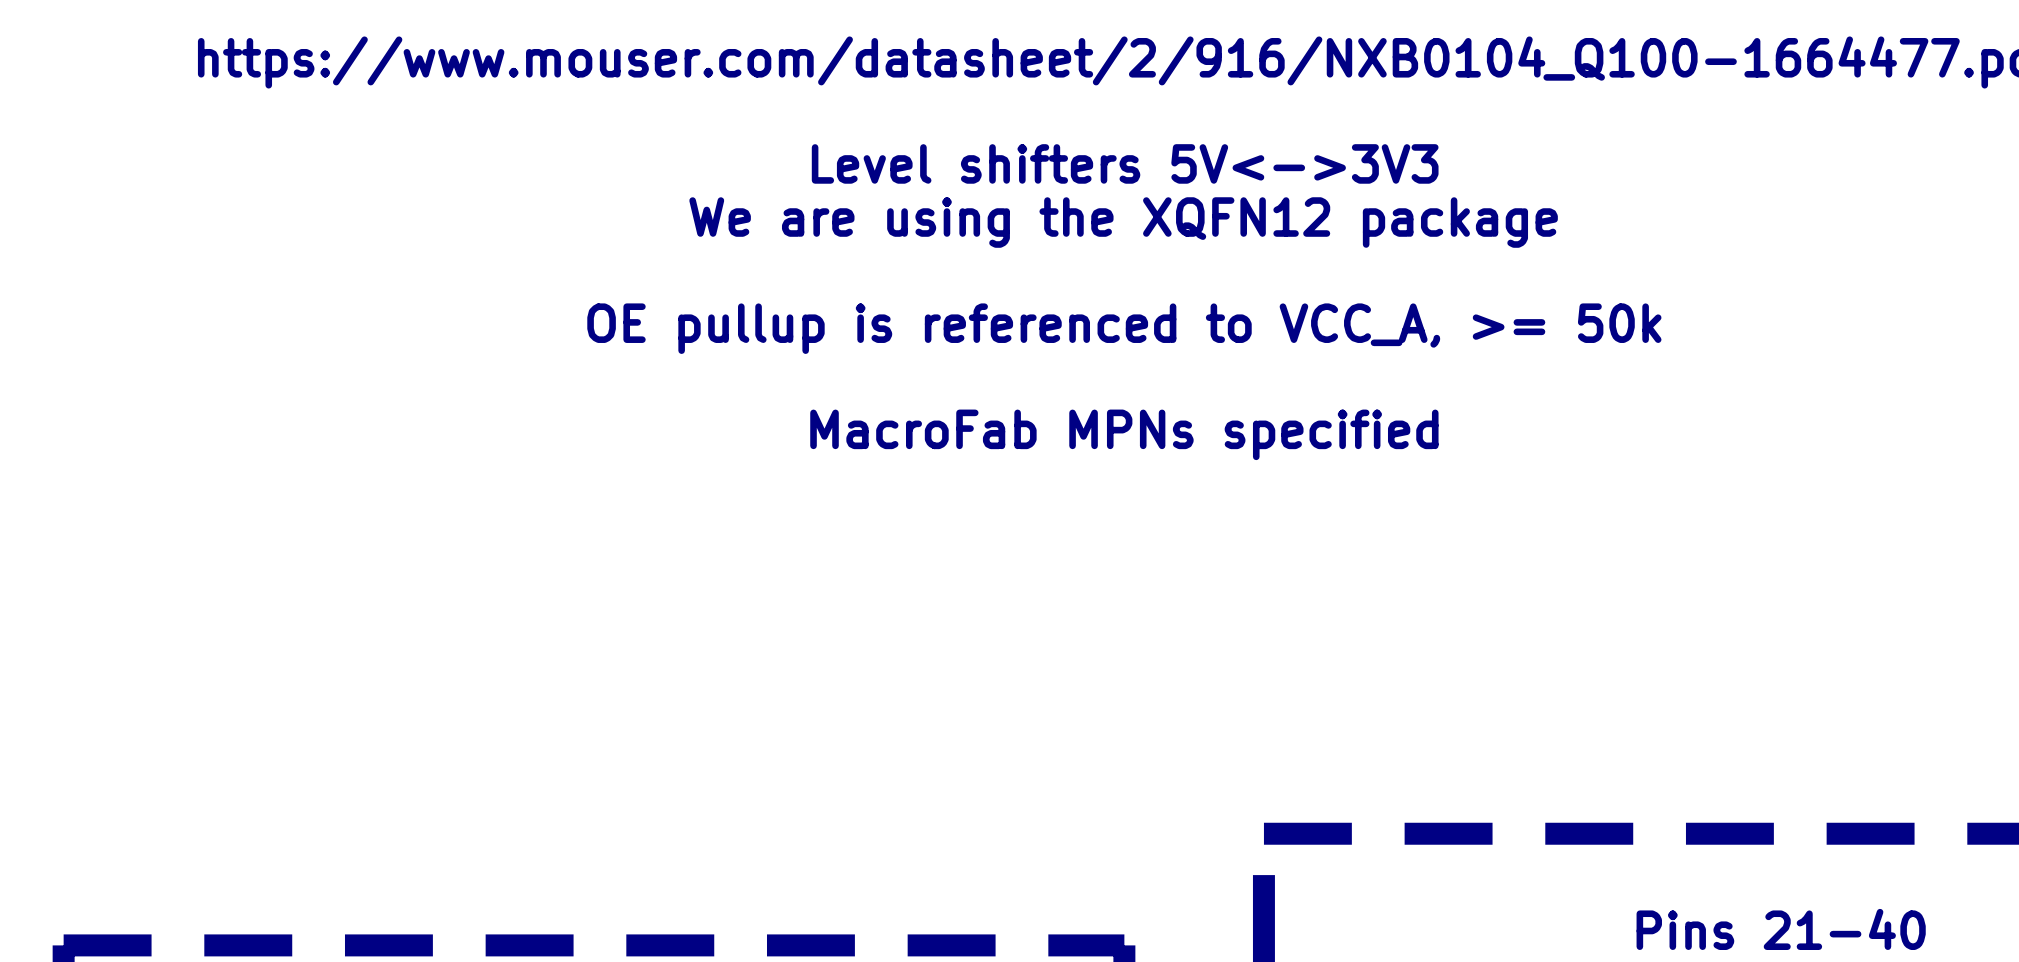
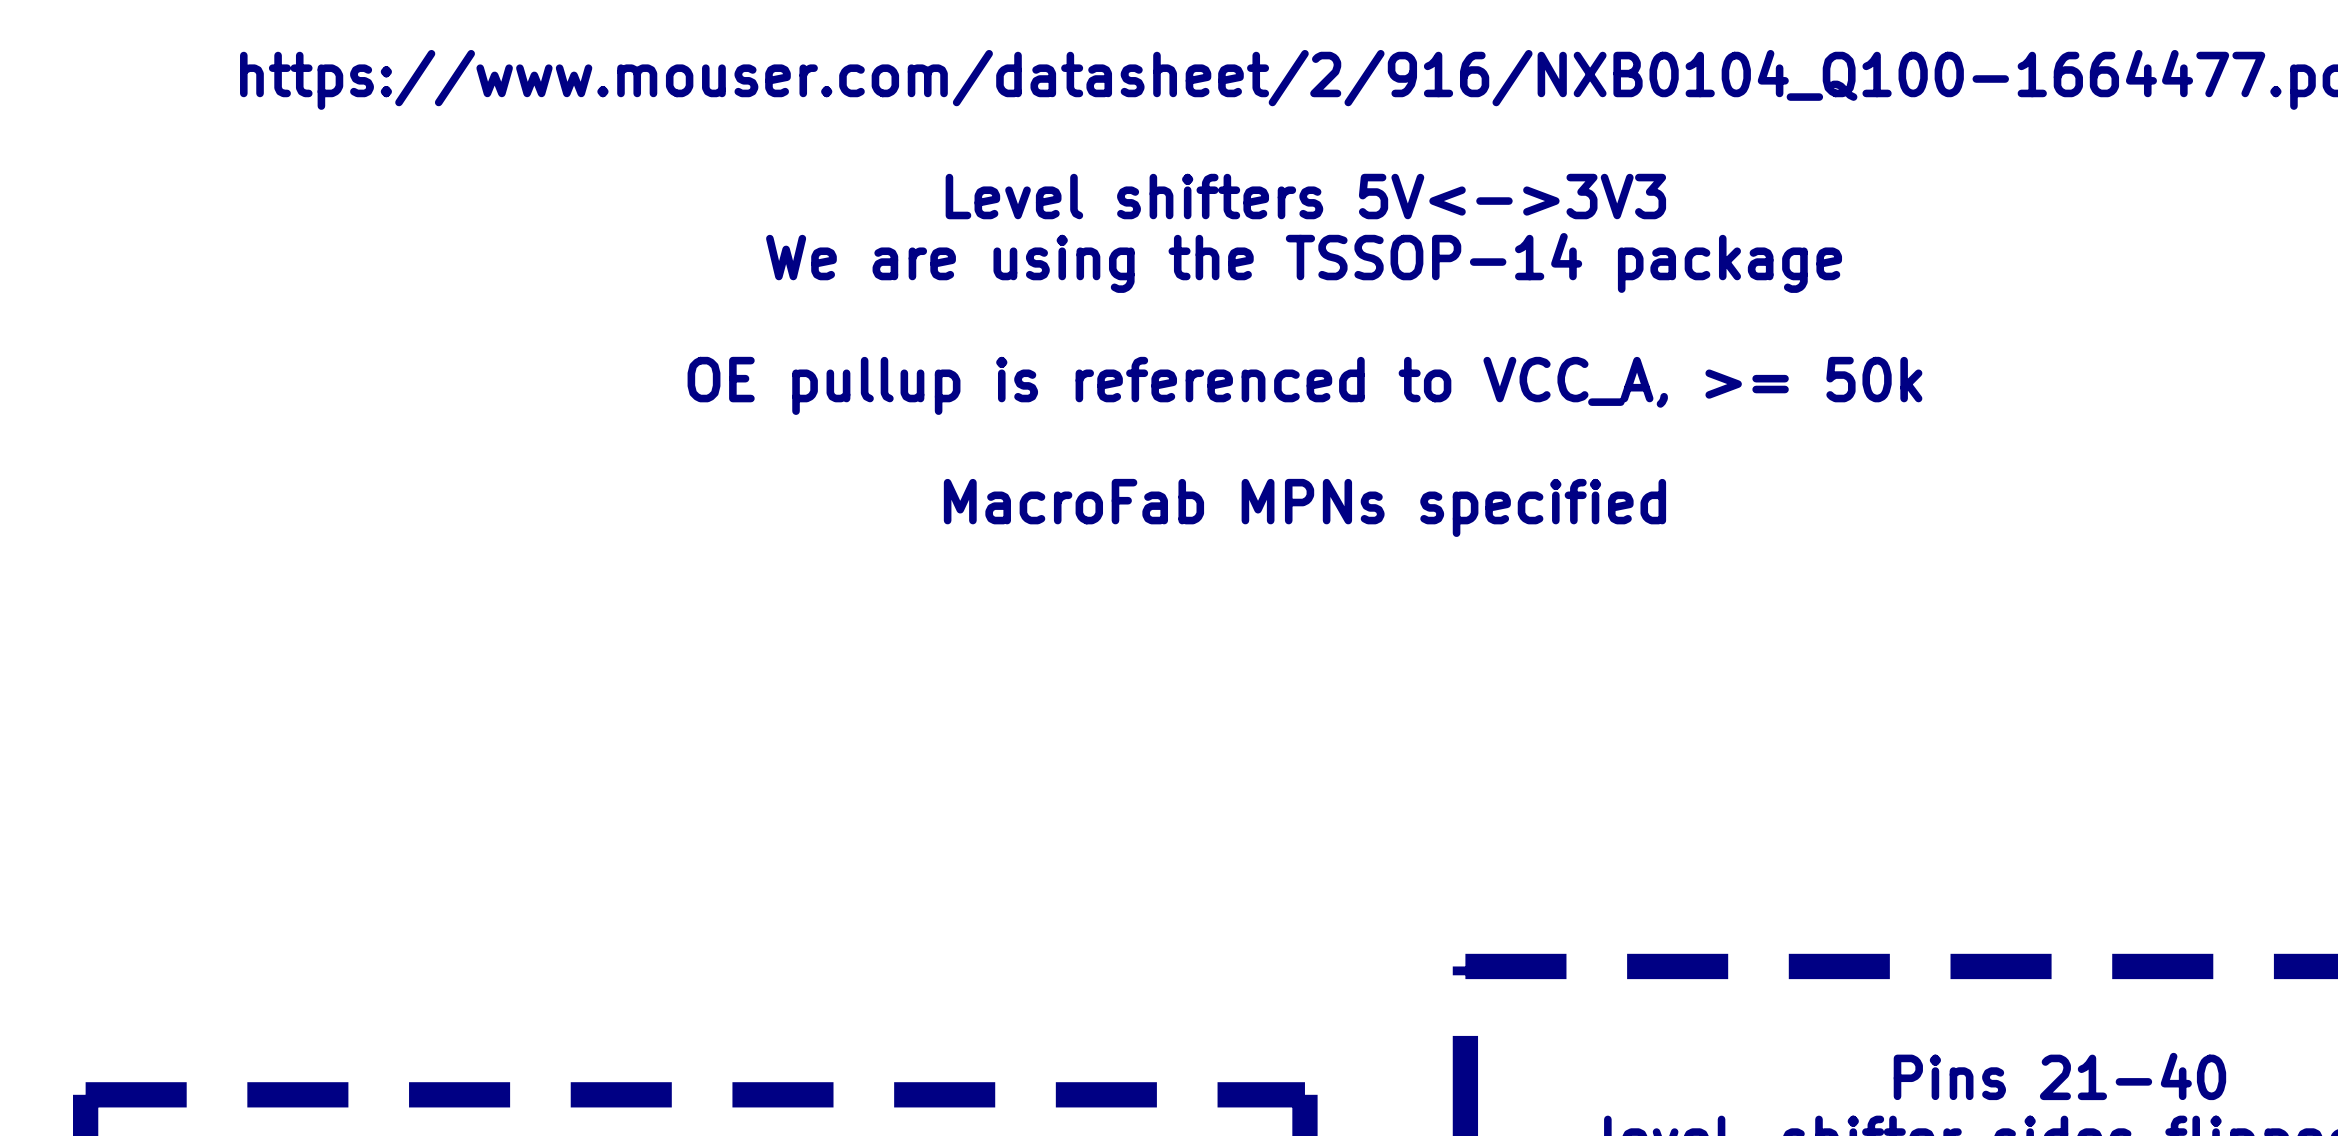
text: We are using the XQFN12 package (1123, 222) -> We are using the TSSOP-14 package (1304, 262)

